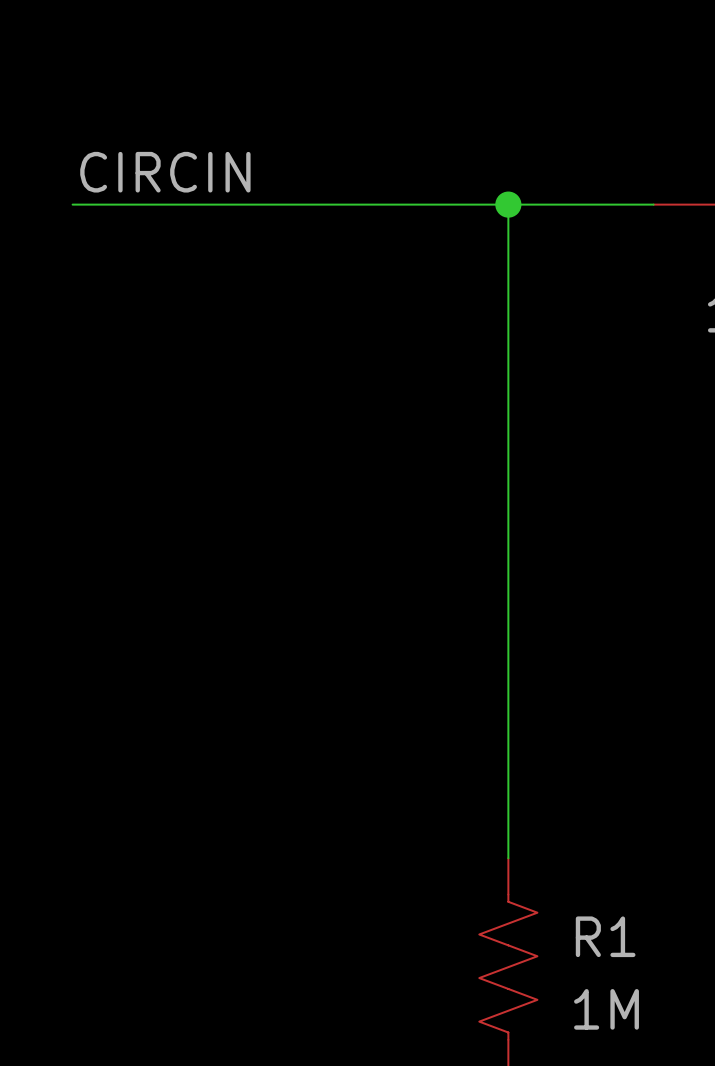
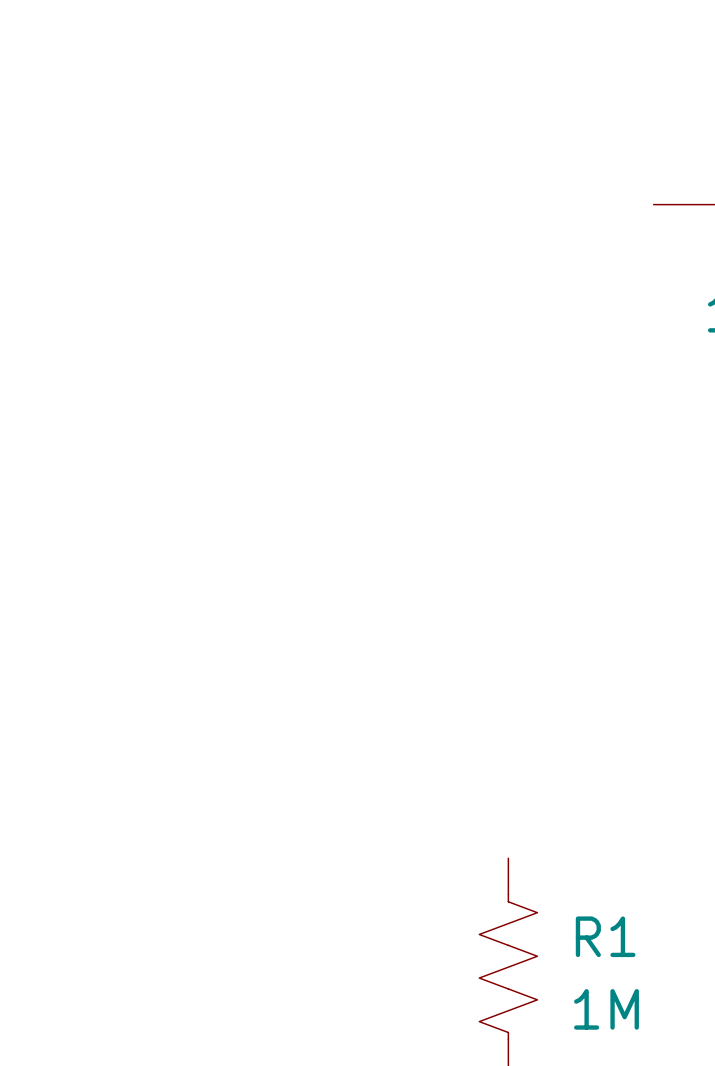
label: CIRCIN (165, 172) -> none
wire: (72, 204) (653, 204) -> none
wire: (508, 204) (508, 858) -> none
junction: (508, 204) -> none

